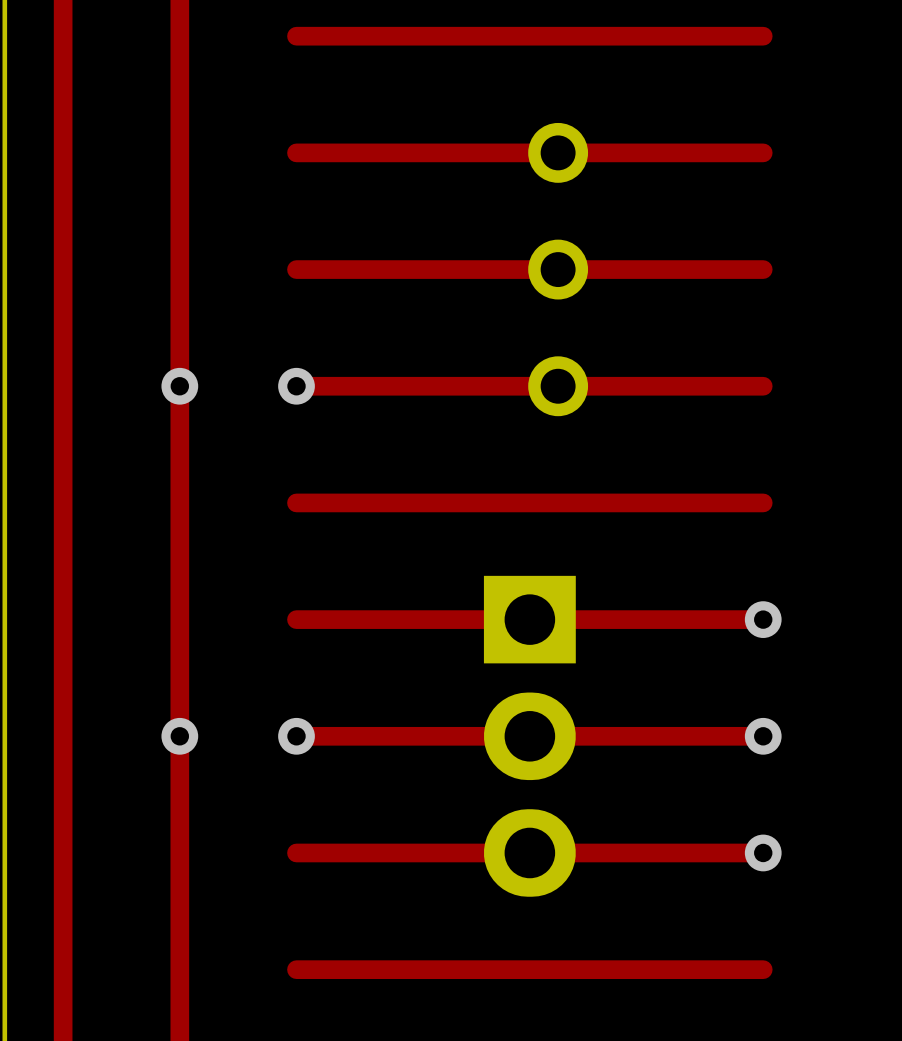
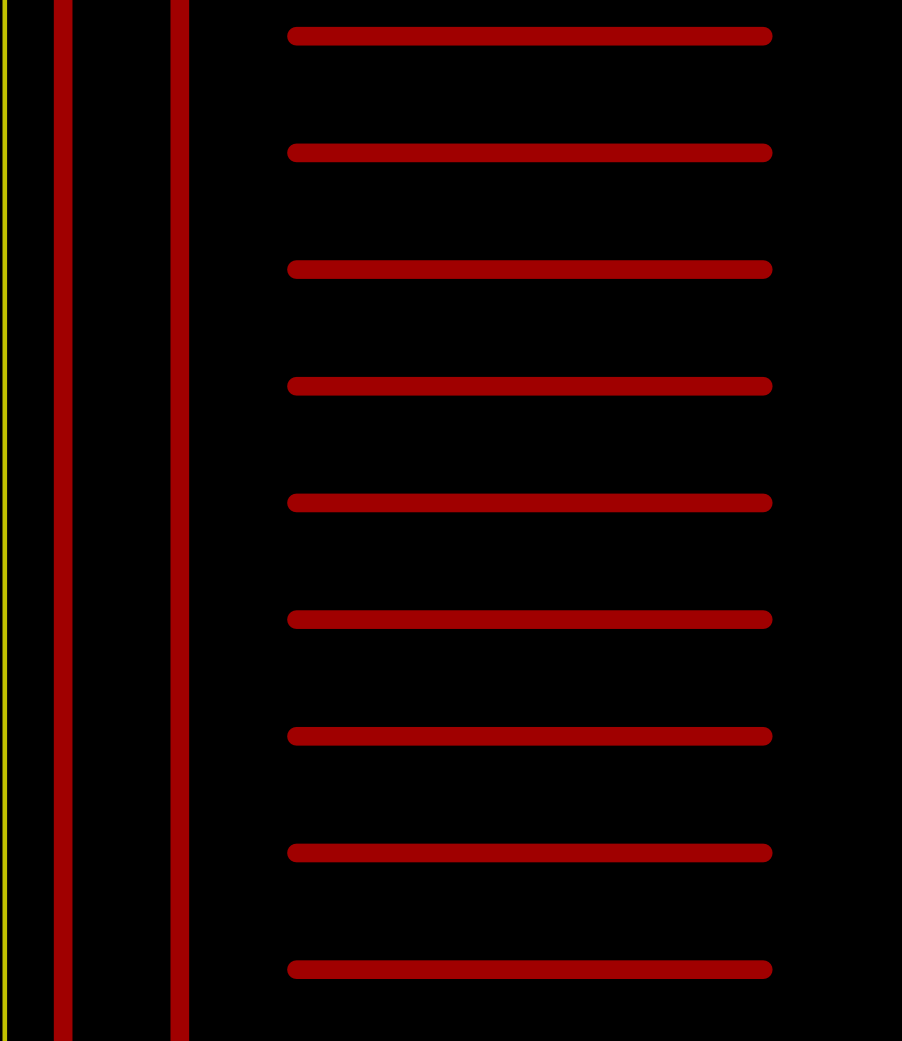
part: (558, 269) -> none
via: (179, 386) -> none
via: (296, 386) -> none
via: (763, 619) -> none
via: (179, 736) -> none
via: (296, 736) -> none
part: (529, 736) -> none
via: (763, 736) -> none
via: (763, 852) -> none

